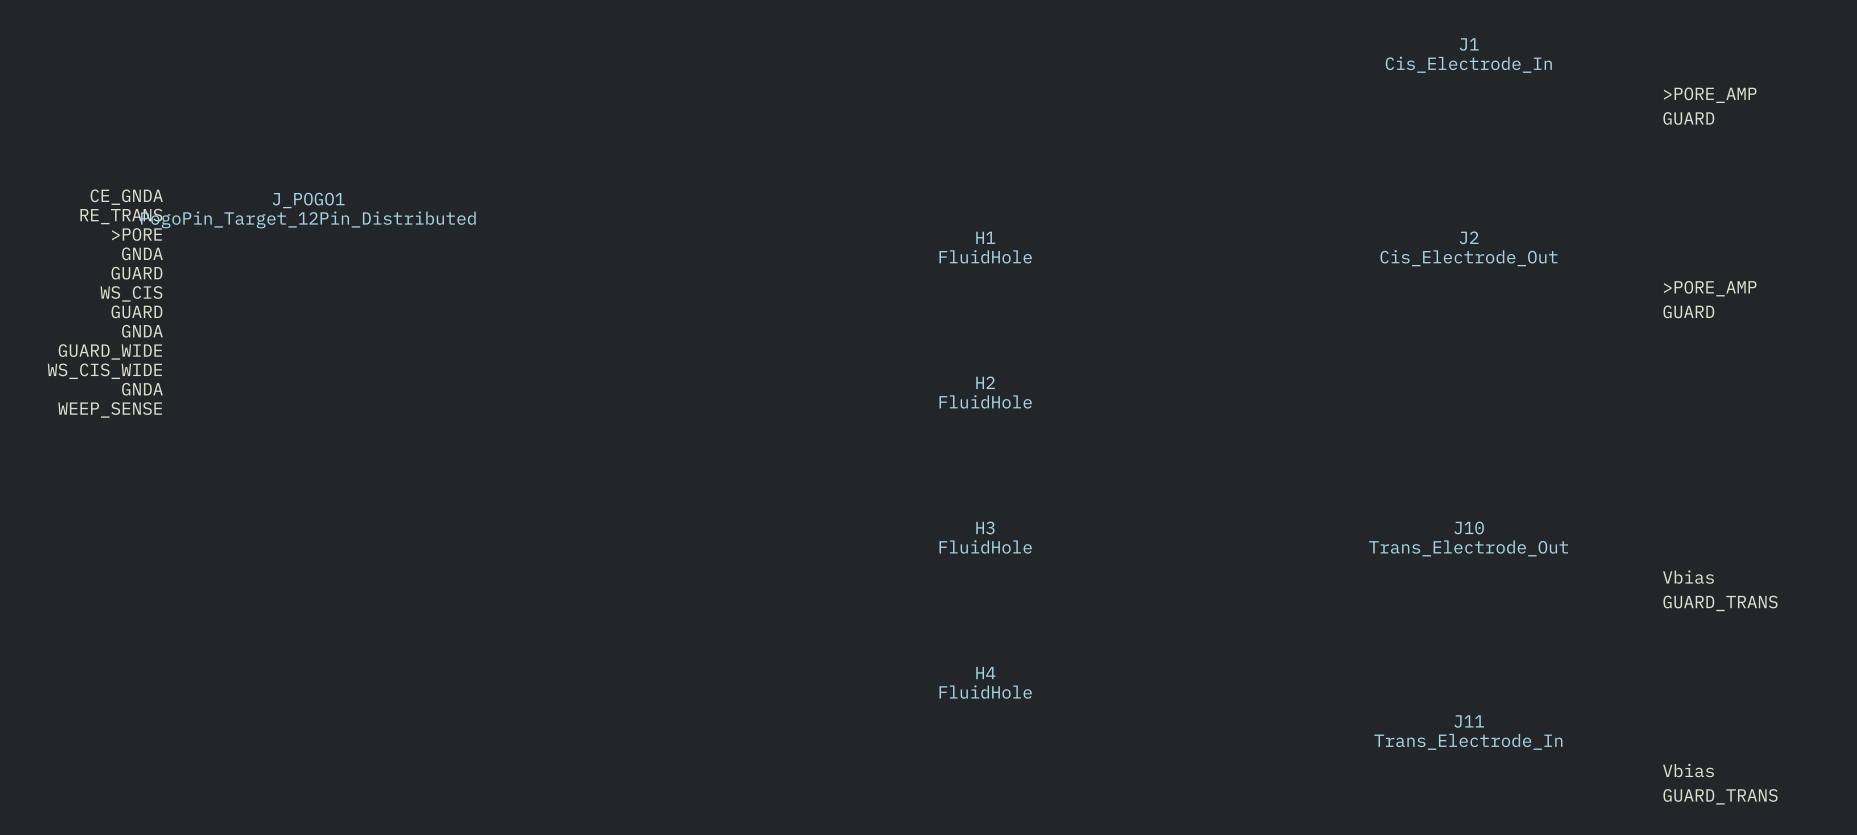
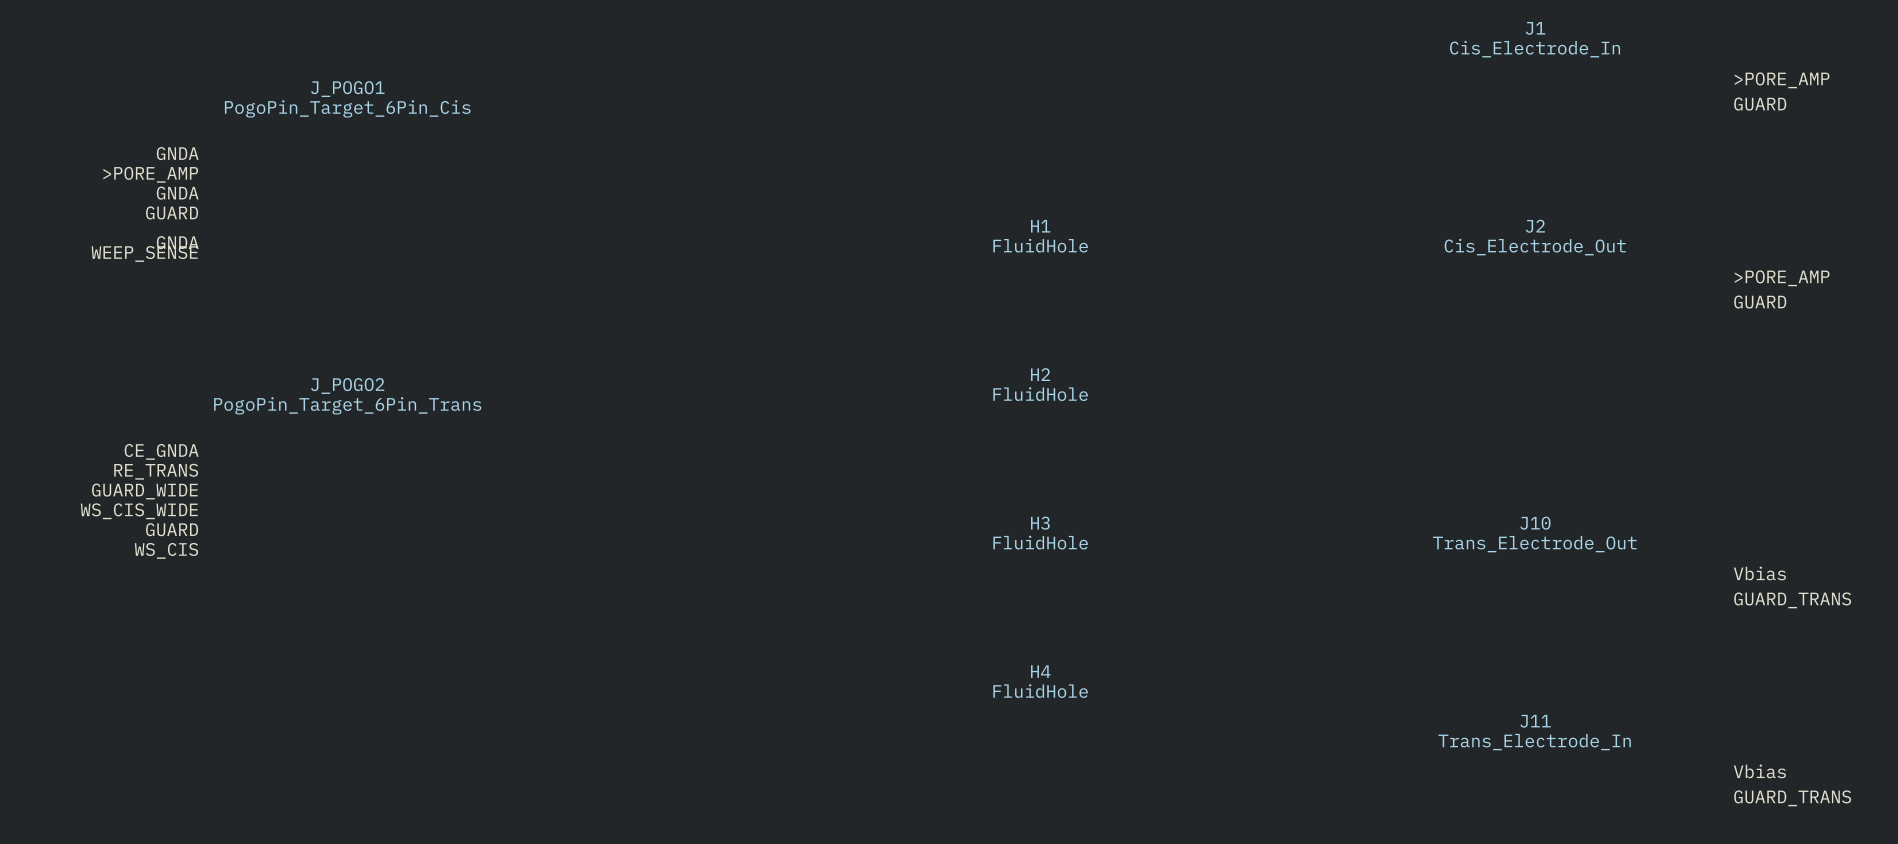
label: none -> GNDA (177, 153)
label: none -> >PORE_AMP (150, 174)
label: CE_GNDA (126, 197) -> GNDA (177, 193)
J_POGO1 position: (308, 210) -> (347, 99)
label: RE_TRANS (121, 216) -> none
J_POGO1 value: PogoPin_Target_12Pin_Distributed (308, 219) -> PogoPin_Target_6Pin_Cis (347, 108)
label: none -> GUARD (172, 212)
label: >PORE (136, 234) -> none
label: GUARD (136, 273) -> none
label: WS_CIS (131, 293) -> none
label: GUARD (136, 311) -> none
label: GNDA (142, 331) -> none
label position: GUARD_WIDE (110, 351) -> GUARD_WIDE (144, 491)
label position: WS_CIS_WIDE (104, 371) -> WS_CIS_WIDE (139, 511)
label: GNDA (142, 389) -> none
J_POGO2: none -> PogoPin_Target_6Pin_Trans (347, 396)
label position: WEEP_SENSE (110, 409) -> WEEP_SENSE (144, 253)
label: none -> CE_GNDA (161, 451)
label: none -> RE_TRANS (156, 471)
label: none -> GUARD (172, 529)
label: none -> WS_CIS (166, 550)

